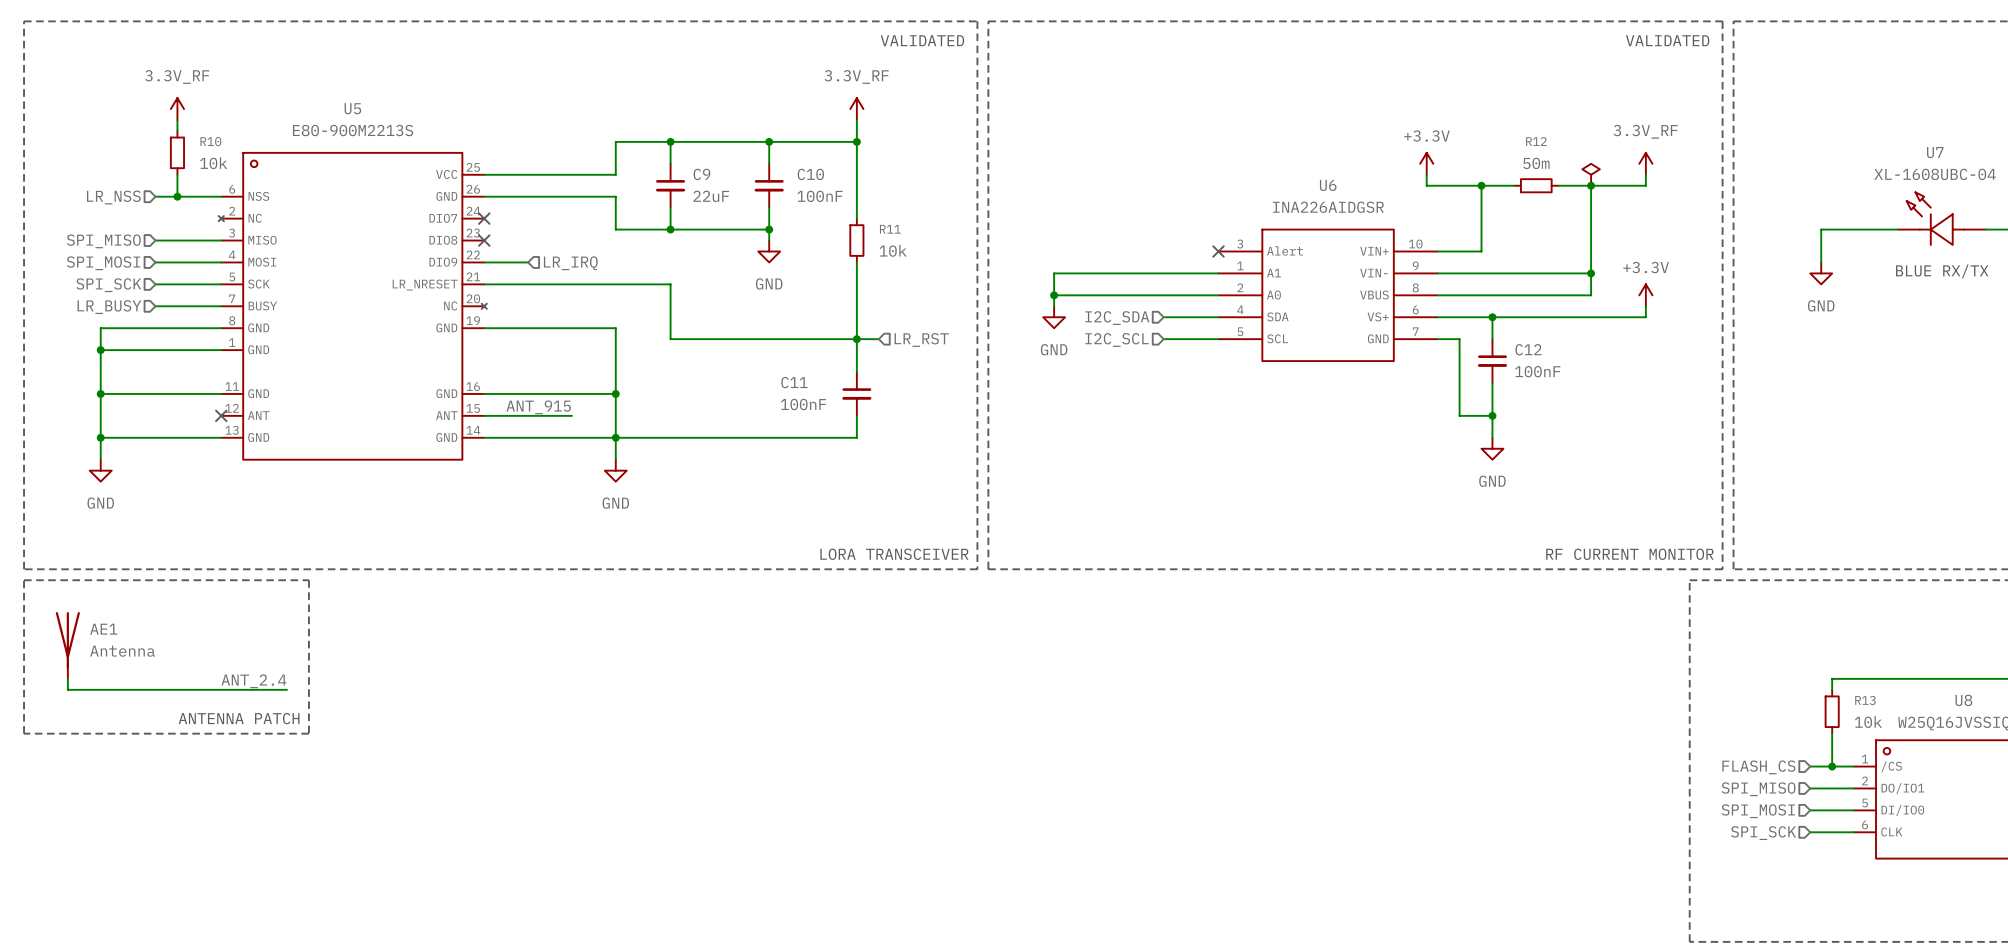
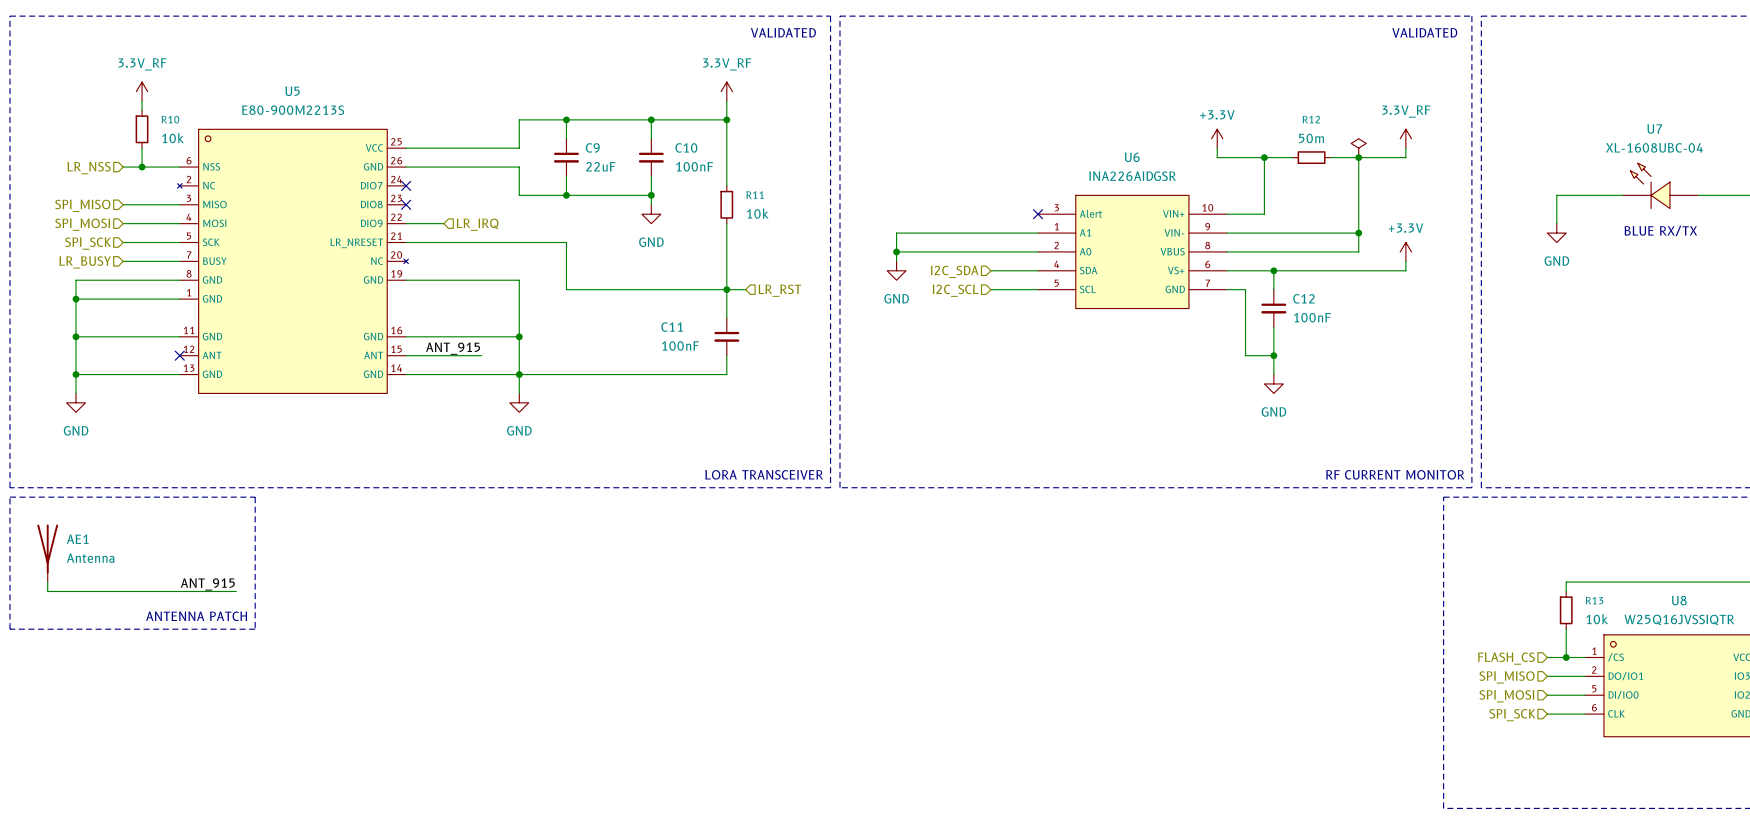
label: ANT_2.4 (254, 681) -> ANT_915 (207, 584)

